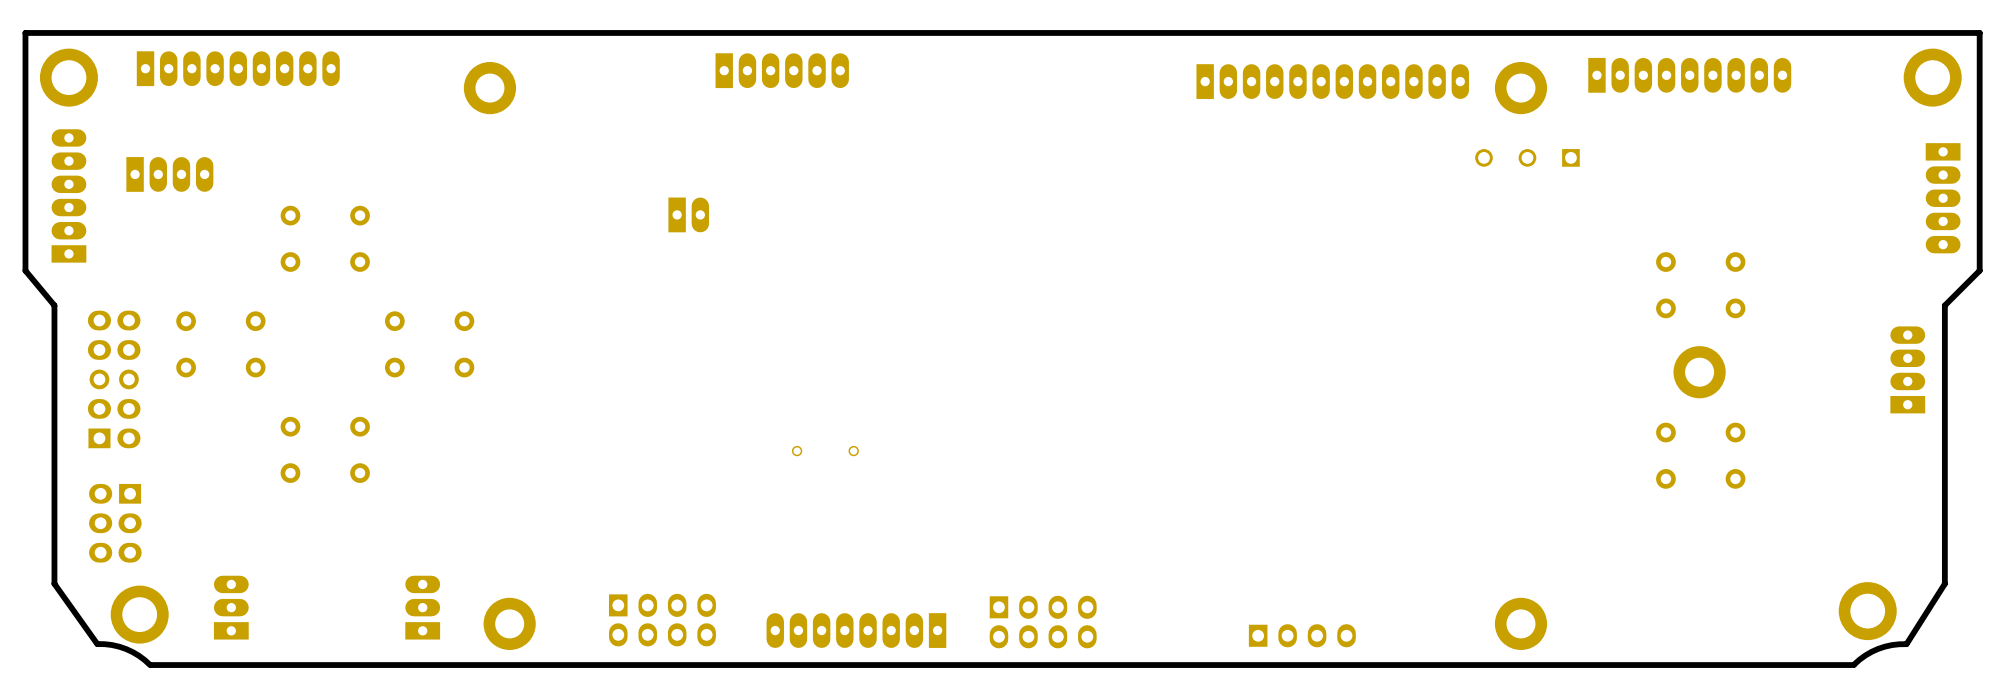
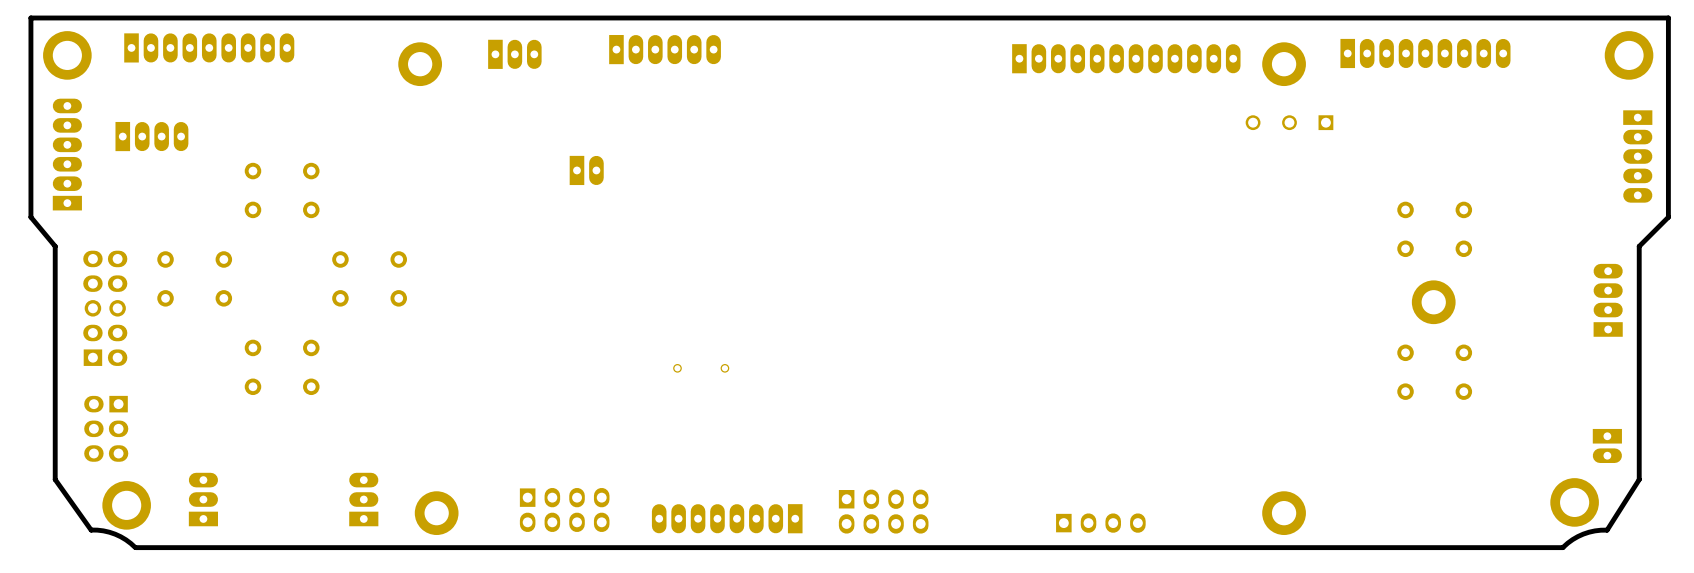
part: none -> (514, 54)
part: none -> (1607, 445)

